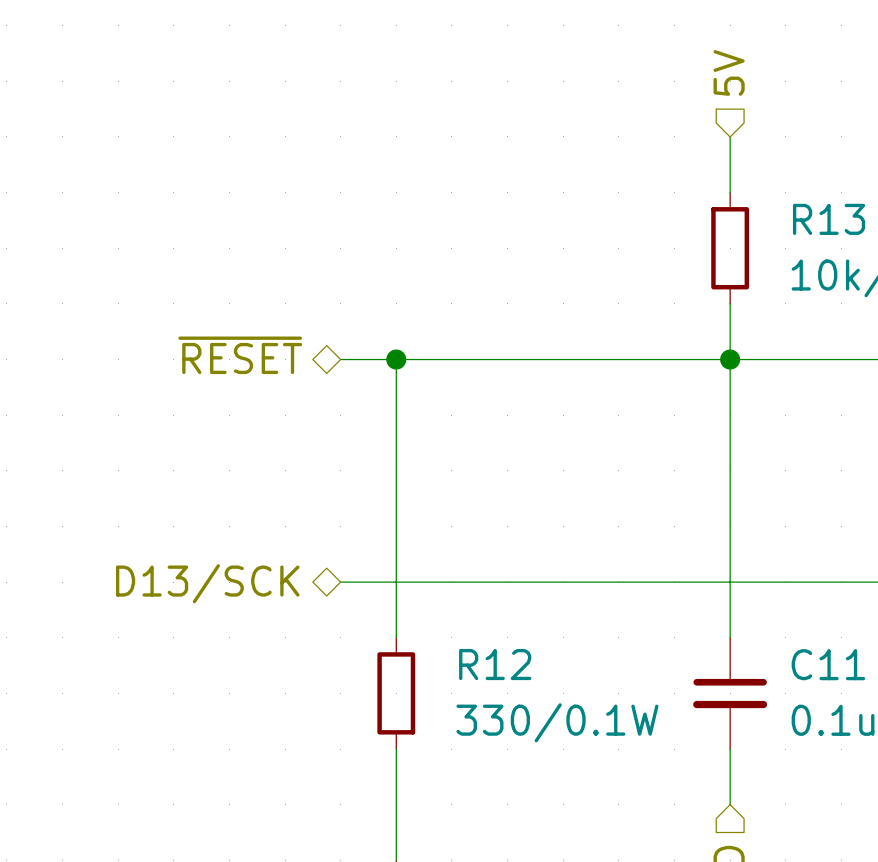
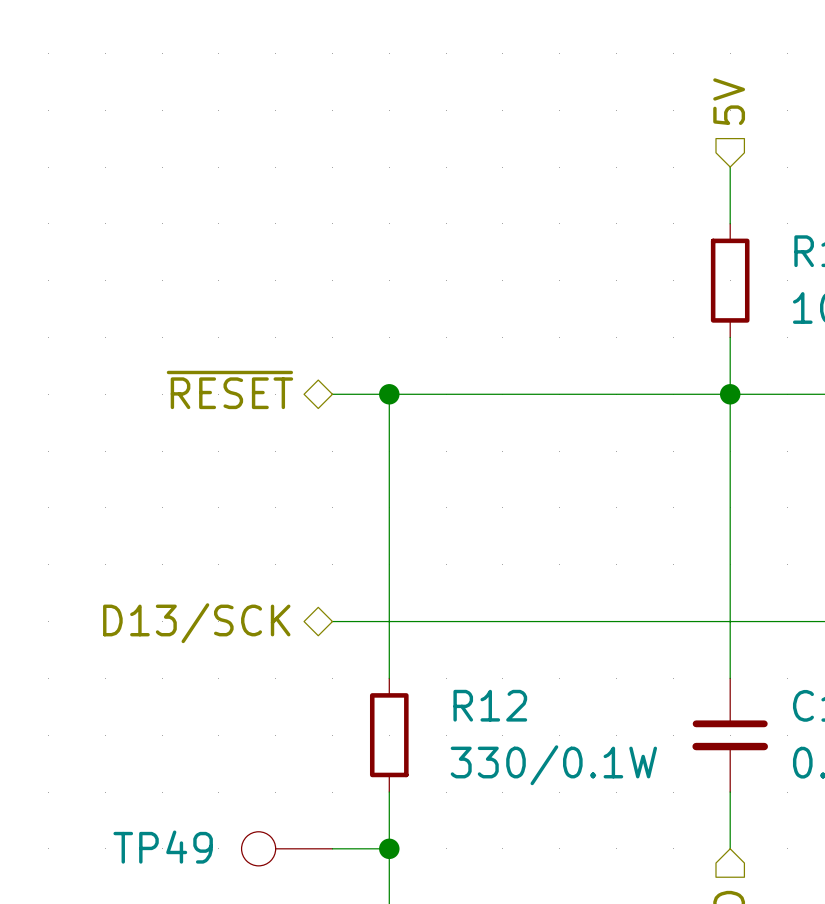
TP49: none -> (287, 848)
wire: none -> (332, 848) (389, 848)
junction: none -> (389, 848)

